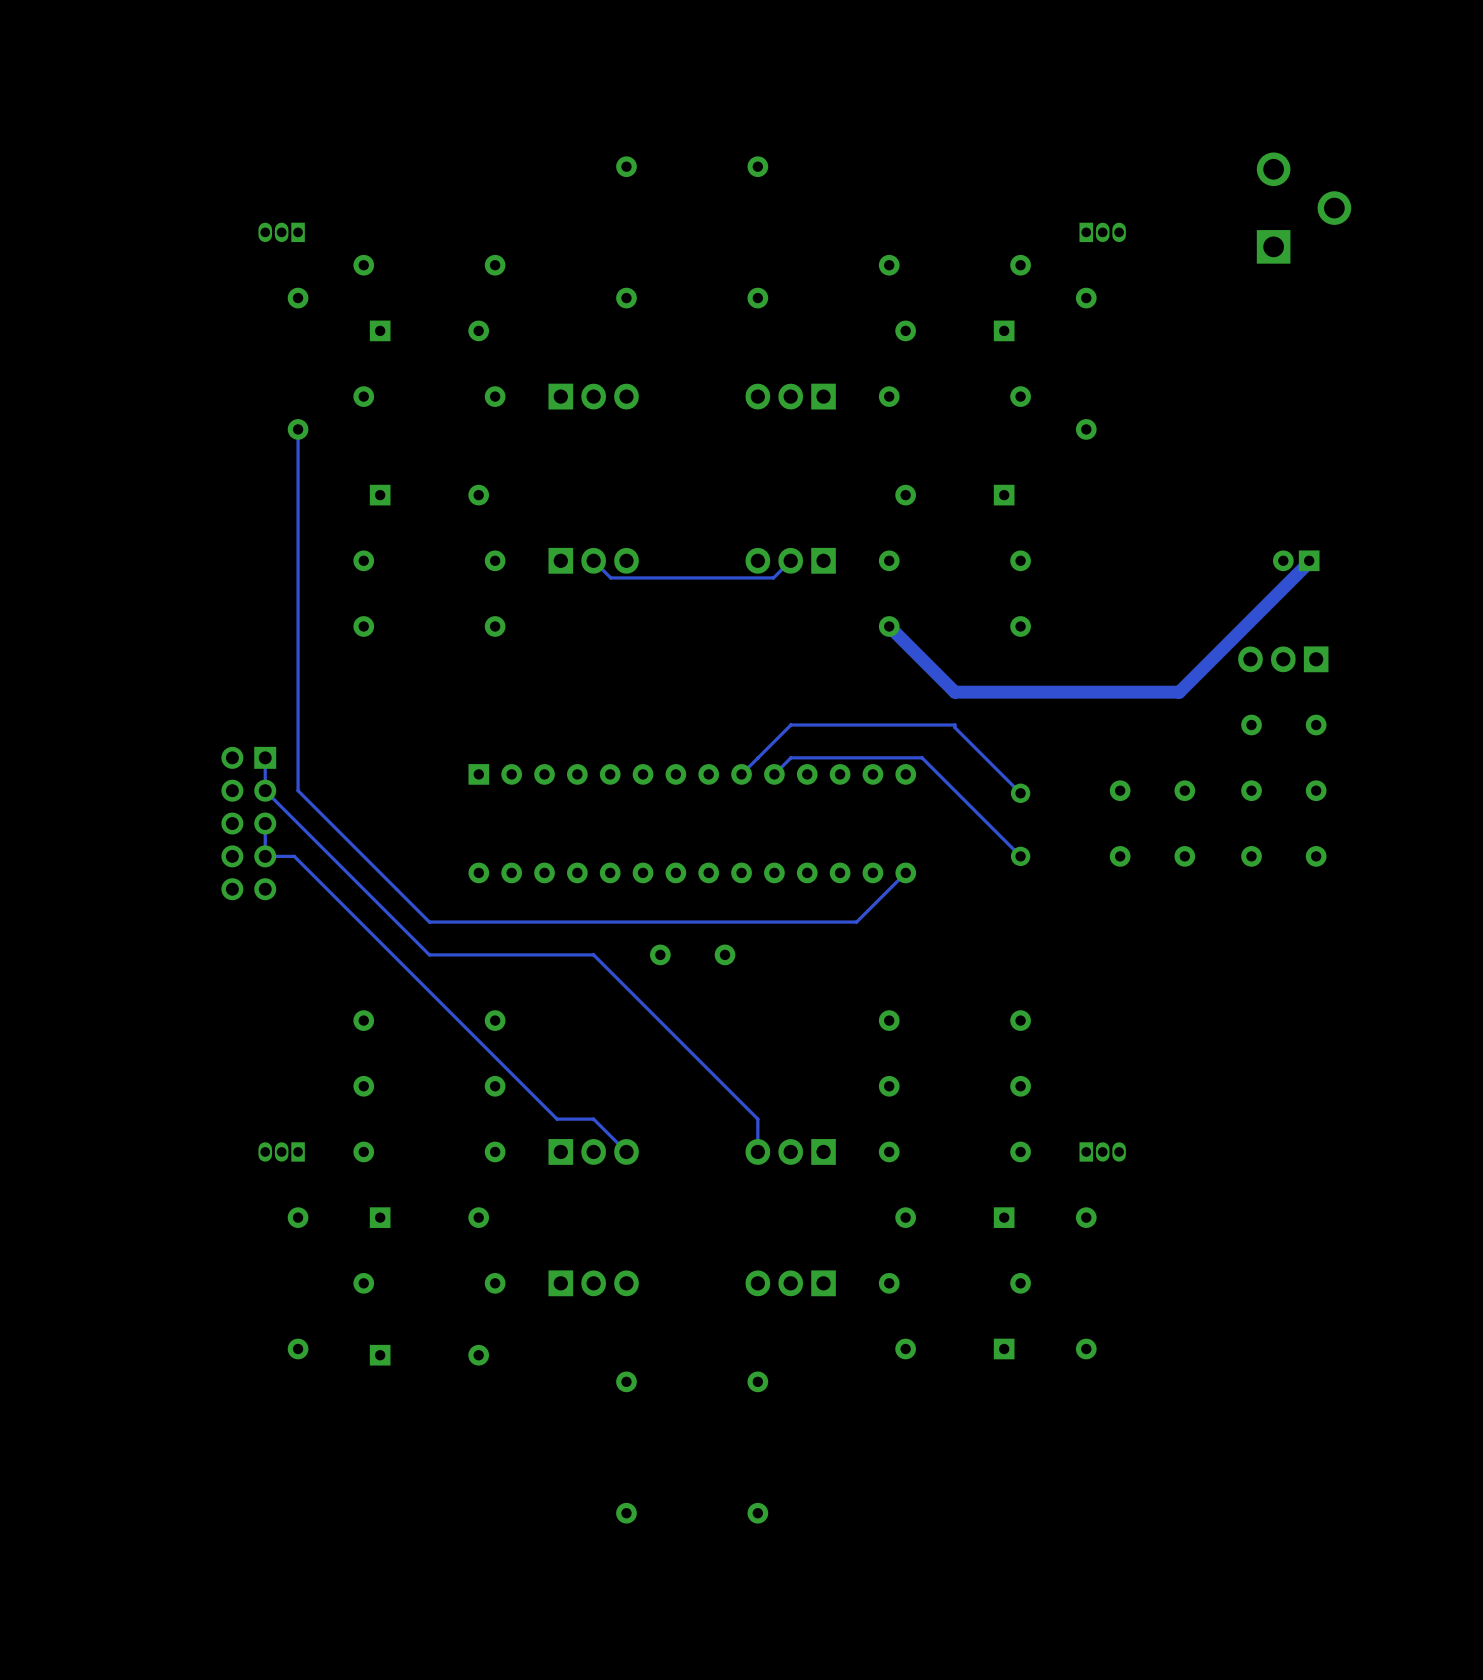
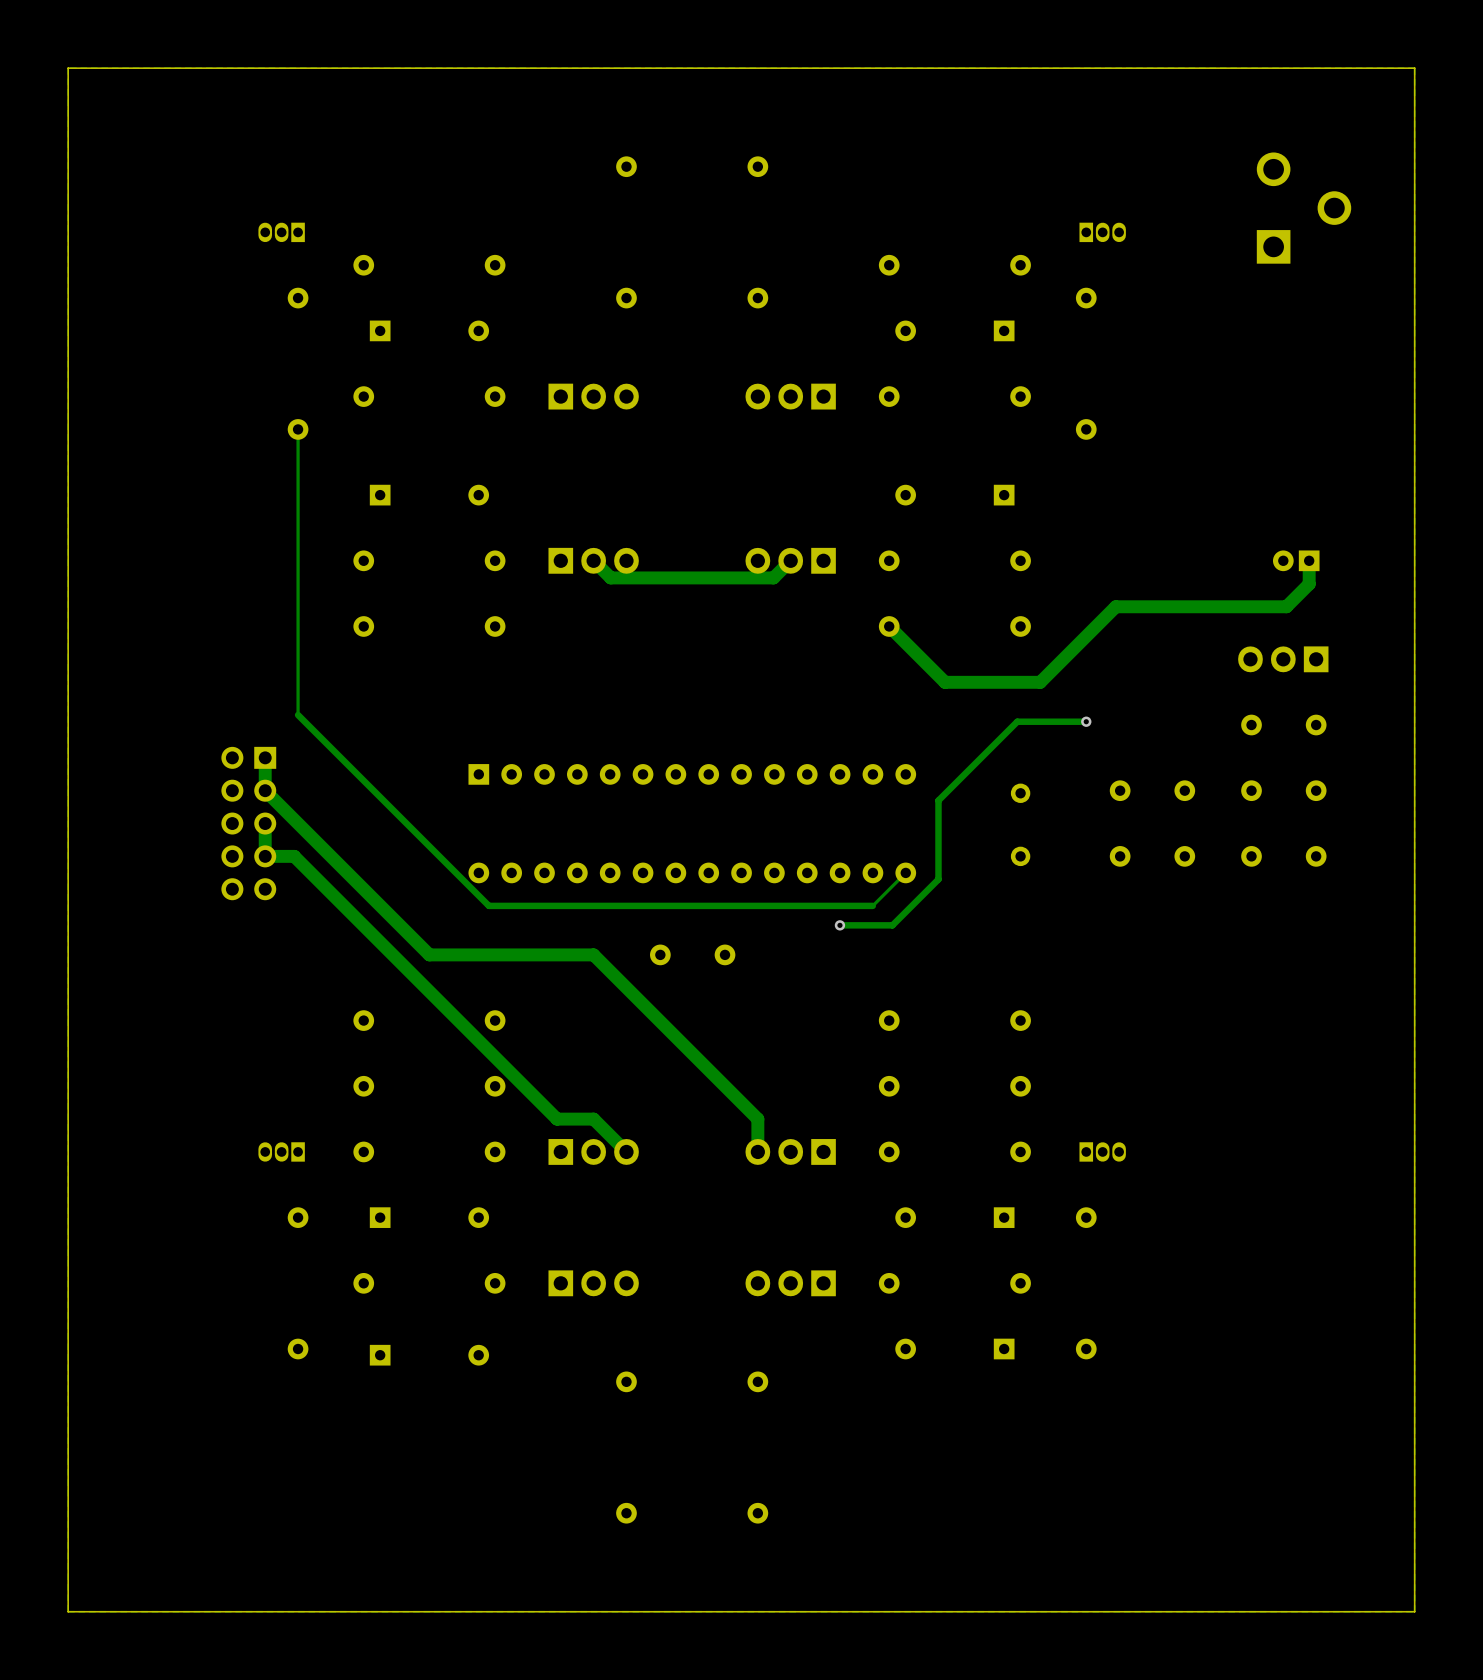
board edge: none -> (1414, 68) (1414, 1611) (68, 1611) (68, 68) (1414, 68)
track width: thin (790, 560) (773, 577) (610, 577) (593, 560) -> thick (790, 560) (773, 577) (610, 577) (593, 560)
track: (1309, 562) (1179, 692) (954, 692) (945, 682) -> (1309, 562) (1309, 584) (1286, 606) (1115, 606) (1040, 682) (945, 682)
track: (298, 715) (298, 790) (429, 922) (856, 922) (872, 905) -> (298, 715) (488, 905) (872, 905)
track: none -> (1086, 721) (1017, 721) (938, 800) (938, 879) (892, 925) (839, 925)
via: none -> (1086, 721)
track width: thin (265, 757) (265, 790) (429, 954) (593, 954) (757, 1119) (757, 1151) -> thick (265, 757) (265, 790) (429, 954) (593, 954) (757, 1119) (757, 1151)
track: (790, 757) (922, 757) (1020, 856) -> none
track: (790, 758) (774, 774) -> none
track: (741, 774) (790, 725) (954, 725) (954, 727) (1020, 793) -> none
track width: thin (265, 823) (265, 856) (294, 856) (557, 1119) (593, 1119) (626, 1151) -> thick (265, 823) (265, 856) (294, 856) (557, 1119) (593, 1119) (626, 1151)
via: none -> (839, 925)

